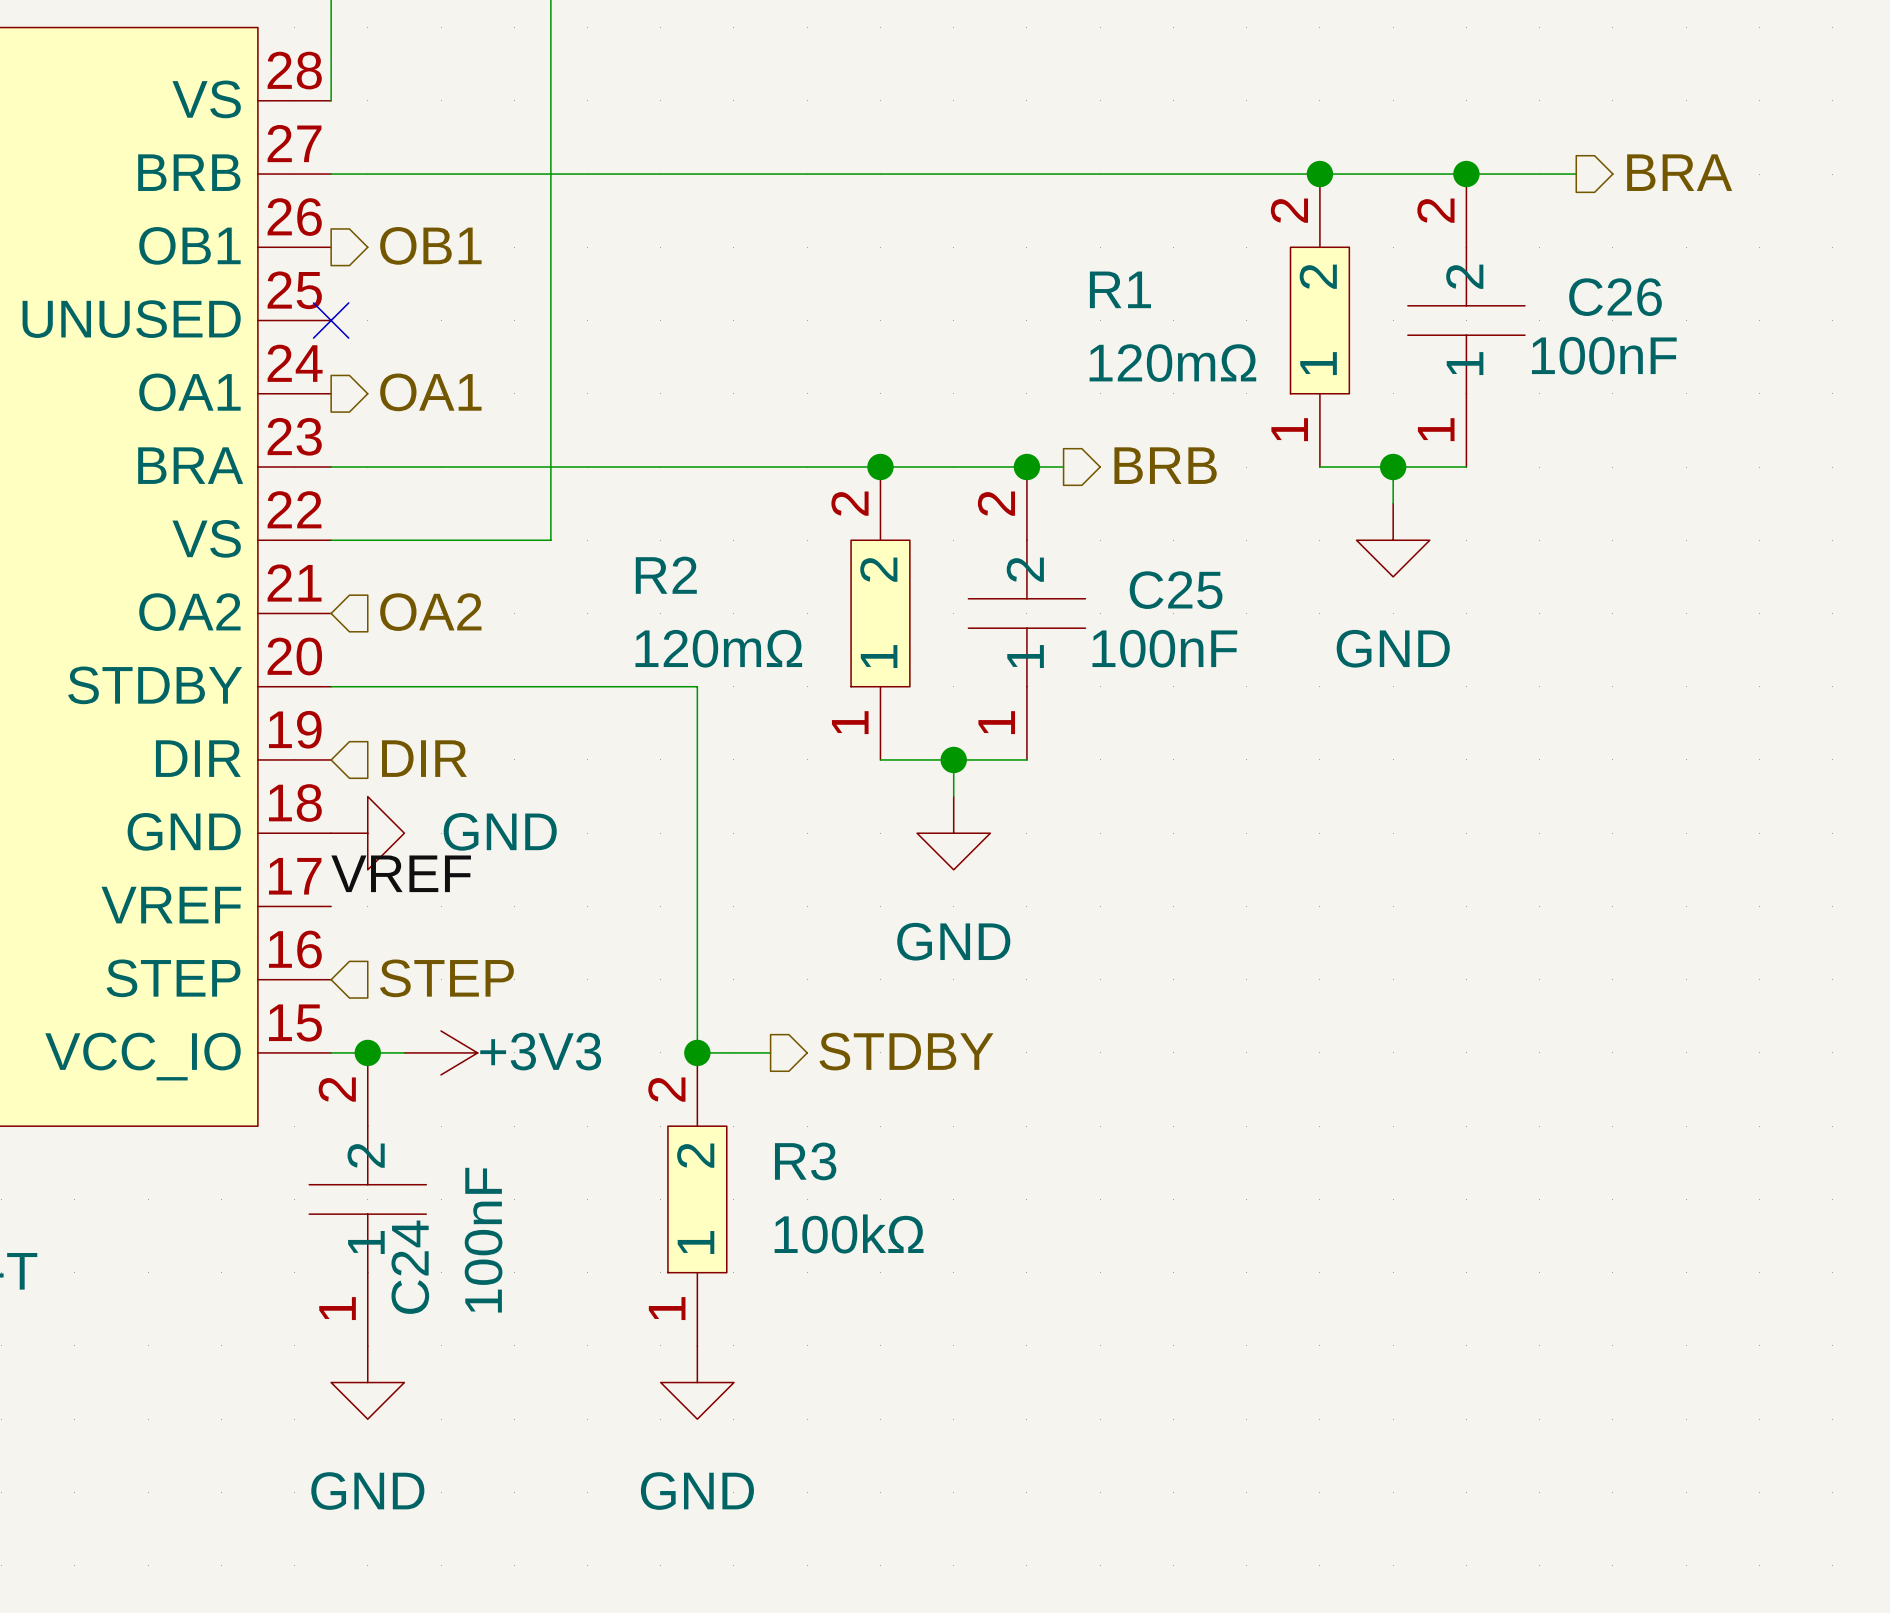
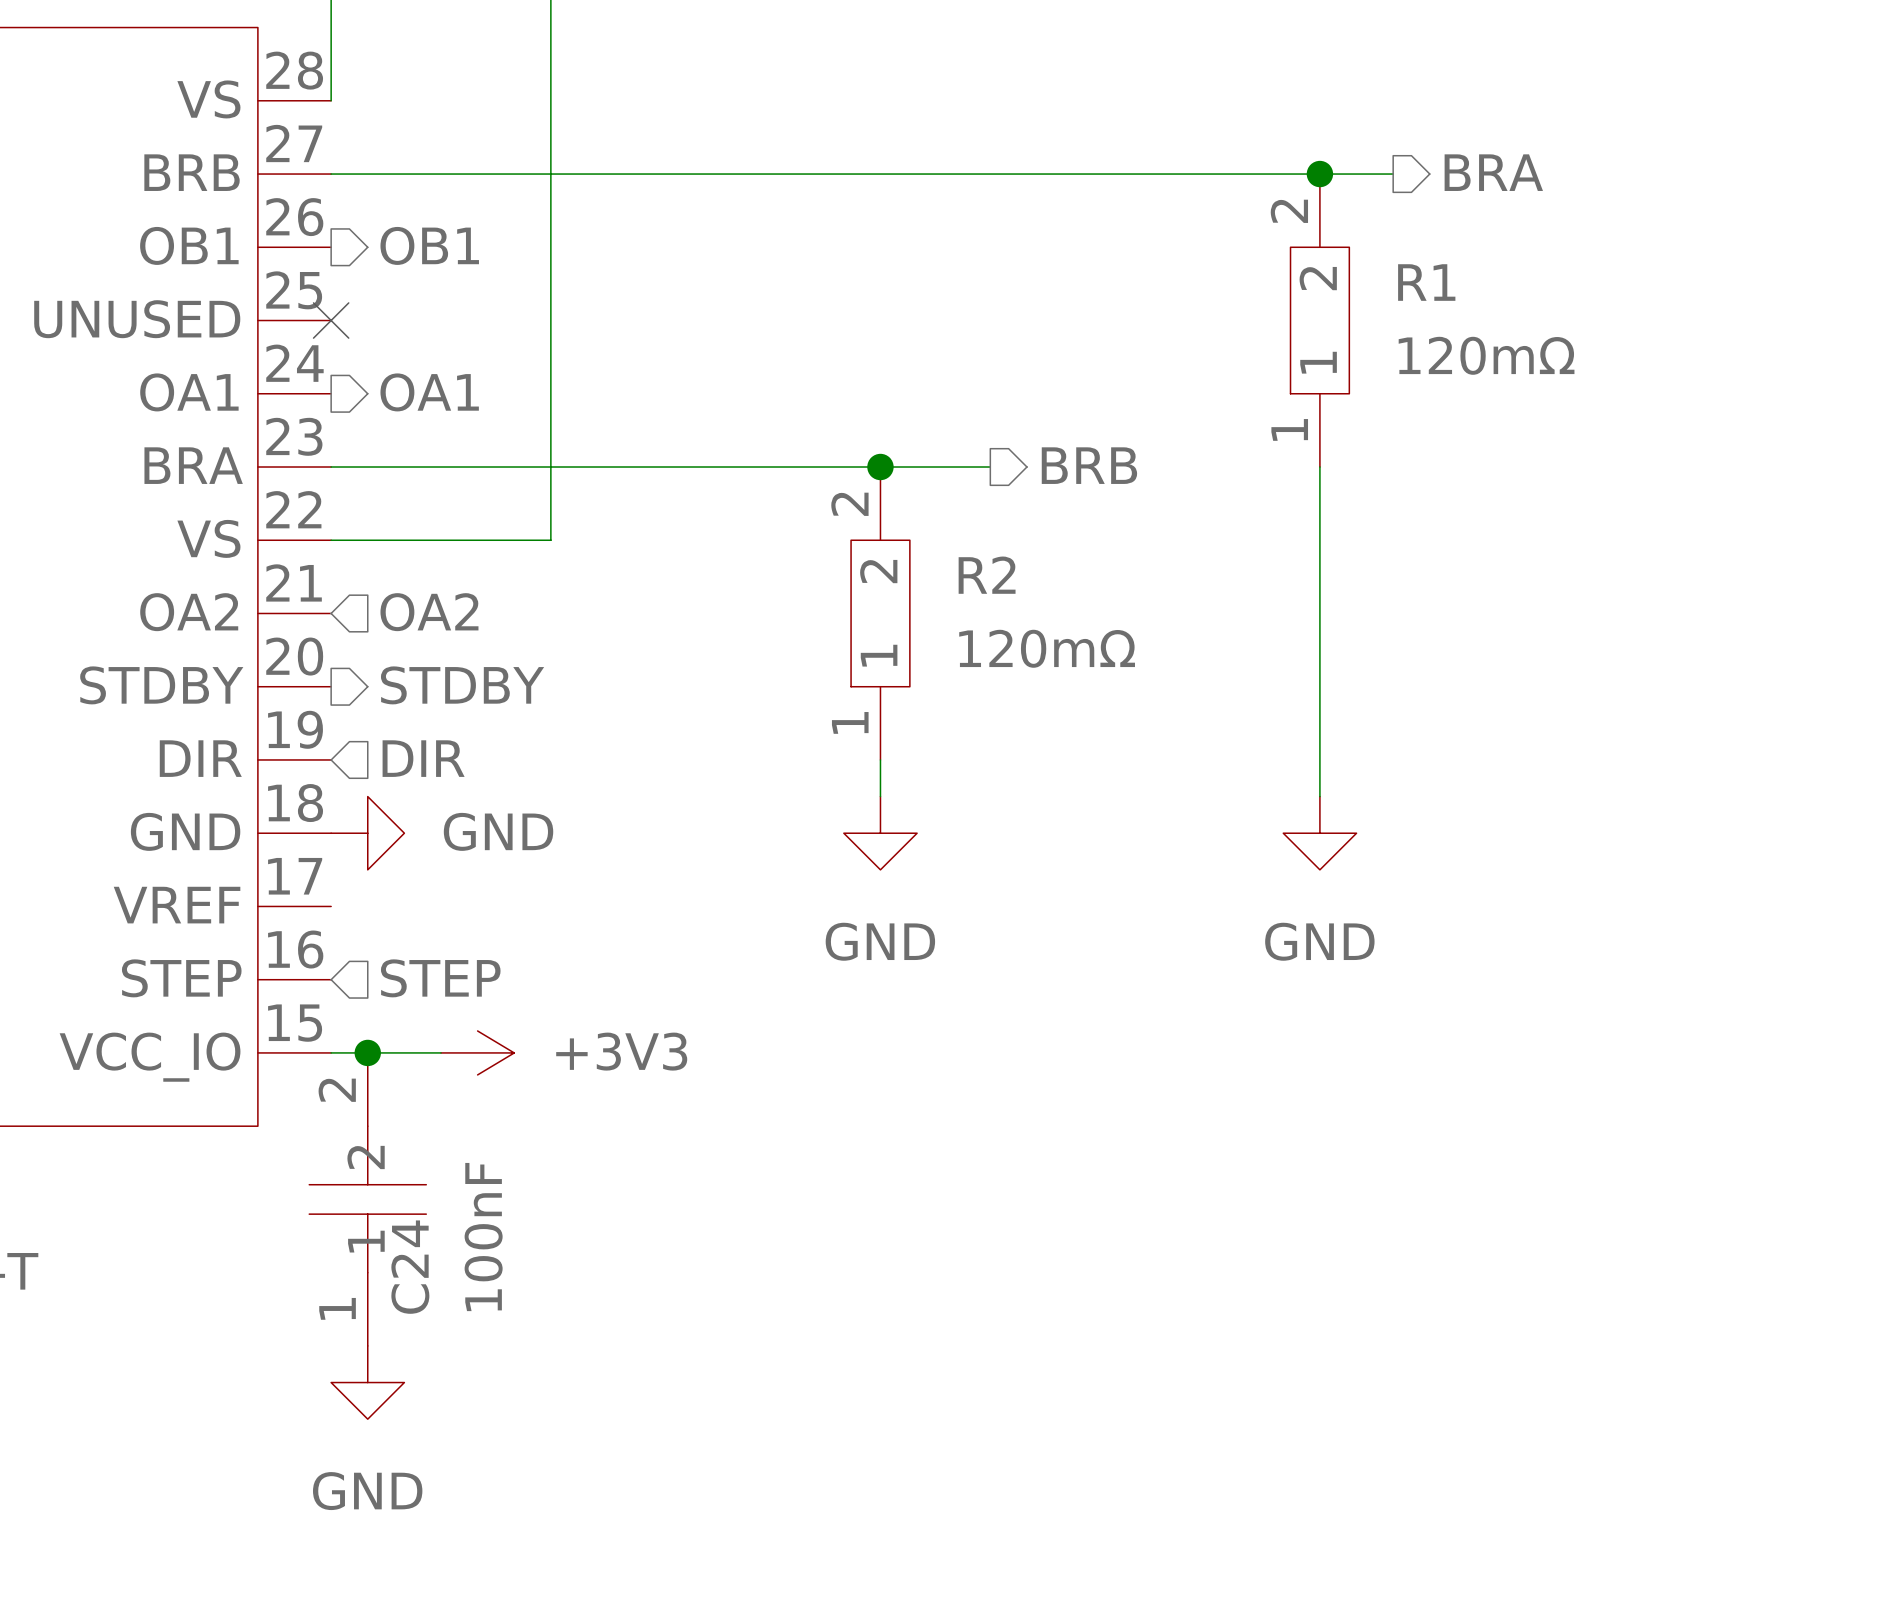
hierarchical label position: BRA (1679, 172) -> BRA (1493, 172)
wire: (1393, 174) (1576, 174) -> none
junction: (1466, 174) -> none
R1 name position: R1 (1120, 289) -> R1 (1426, 282)
C26: 100nF (1466, 320) -> none
R1 value position: 120mΩ (1172, 363) -> 120mΩ (1486, 355)
hierarchical label position: BRB (1165, 465) -> BRB (1089, 465)
wire: (990, 467) (1063, 467) -> none
junction: (1026, 467) -> none
wire: (1319, 467) (1466, 467) -> (1319, 467) (1319, 796)
wire: (1393, 467) (1393, 503) -> none
junction: (1393, 467) -> none
power symbol: GND (1393, 540) -> none
R2 name position: R2 (666, 575) -> R2 (987, 575)
C25: 100nF (1026, 613) -> none
R2 value position: 120mΩ (718, 648) -> 120mΩ (1047, 648)
wire: (331, 686) (697, 686) (697, 1052) (770, 1052) -> none
wire: (880, 759) (1026, 759) -> (880, 759) (880, 796)
wire: (953, 759) (953, 796) -> none
junction: (953, 759) -> none
power symbol position: GND (953, 833) -> GND (880, 833)
power symbol: none -> GND (1319, 833)
label: VREF (401, 873) -> none
power symbol text position: +3V3 (540, 1051) -> +3V3 (621, 1051)
hierarchical label position: STDBY (906, 1051) -> STDBY (462, 685)
power symbol position: +3V3 (441, 1052) -> +3V3 (477, 1052)
junction: (697, 1052) -> none
R3: 100kΩ (697, 1199) -> none
power symbol: GND (697, 1382) -> none

